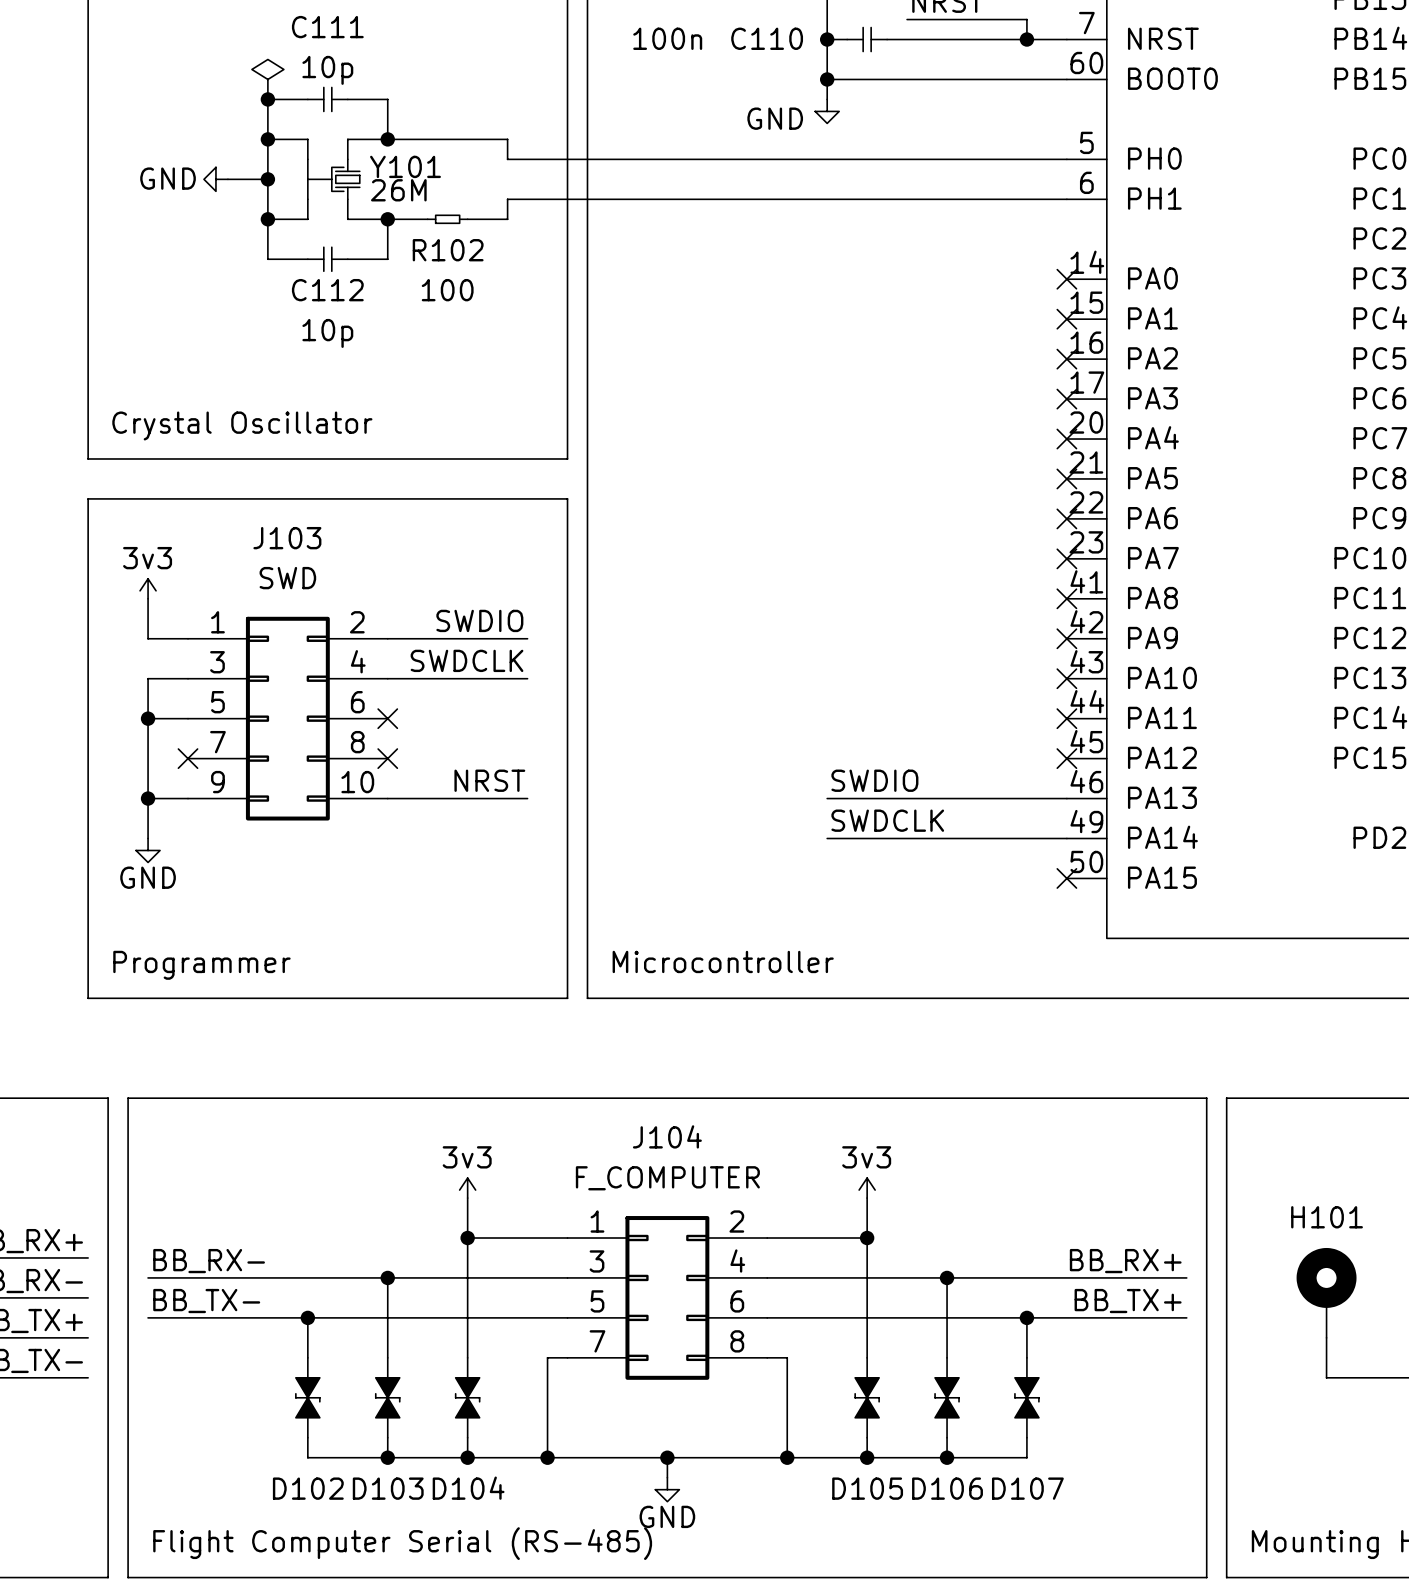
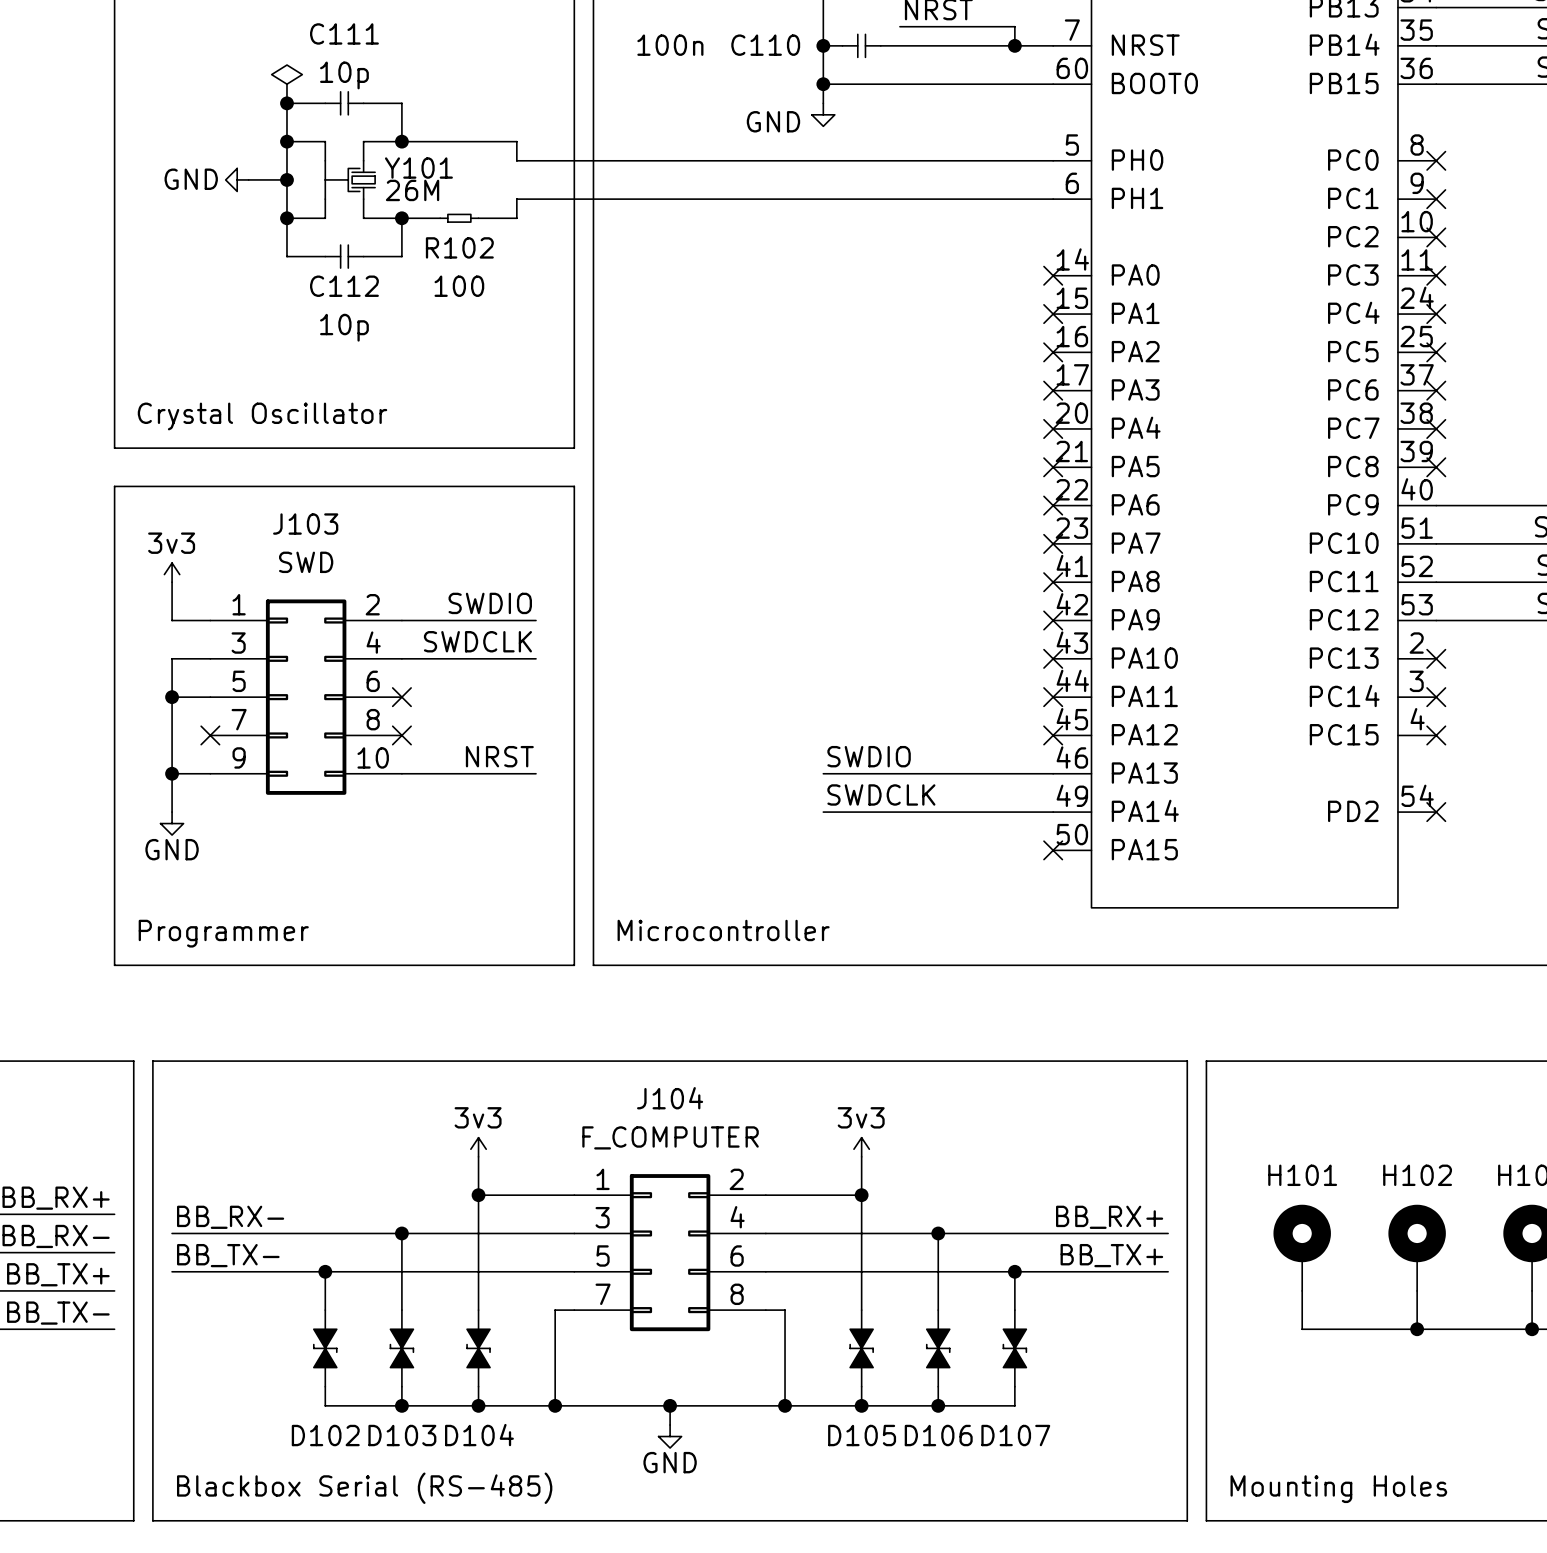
text: Flight Computer Serial (RS-485) (402, 1543) -> Blackbox Serial (RS-485) (364, 1488)

